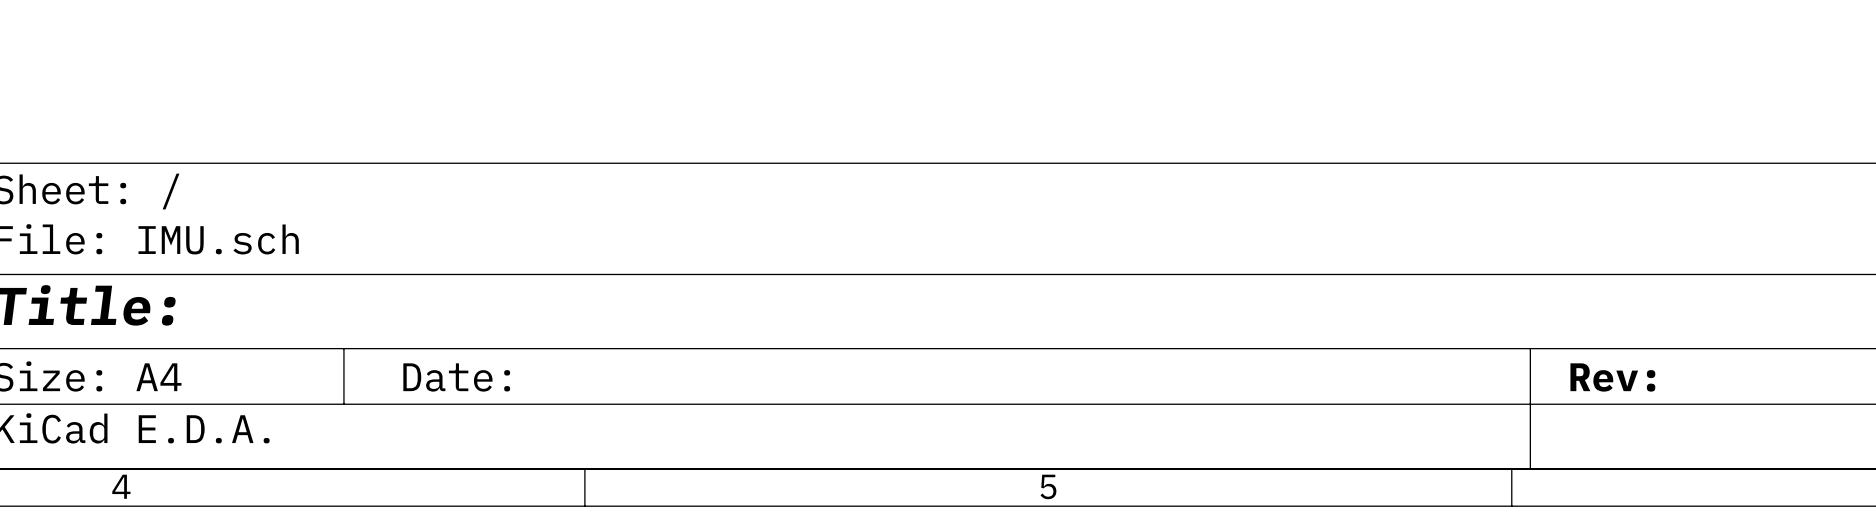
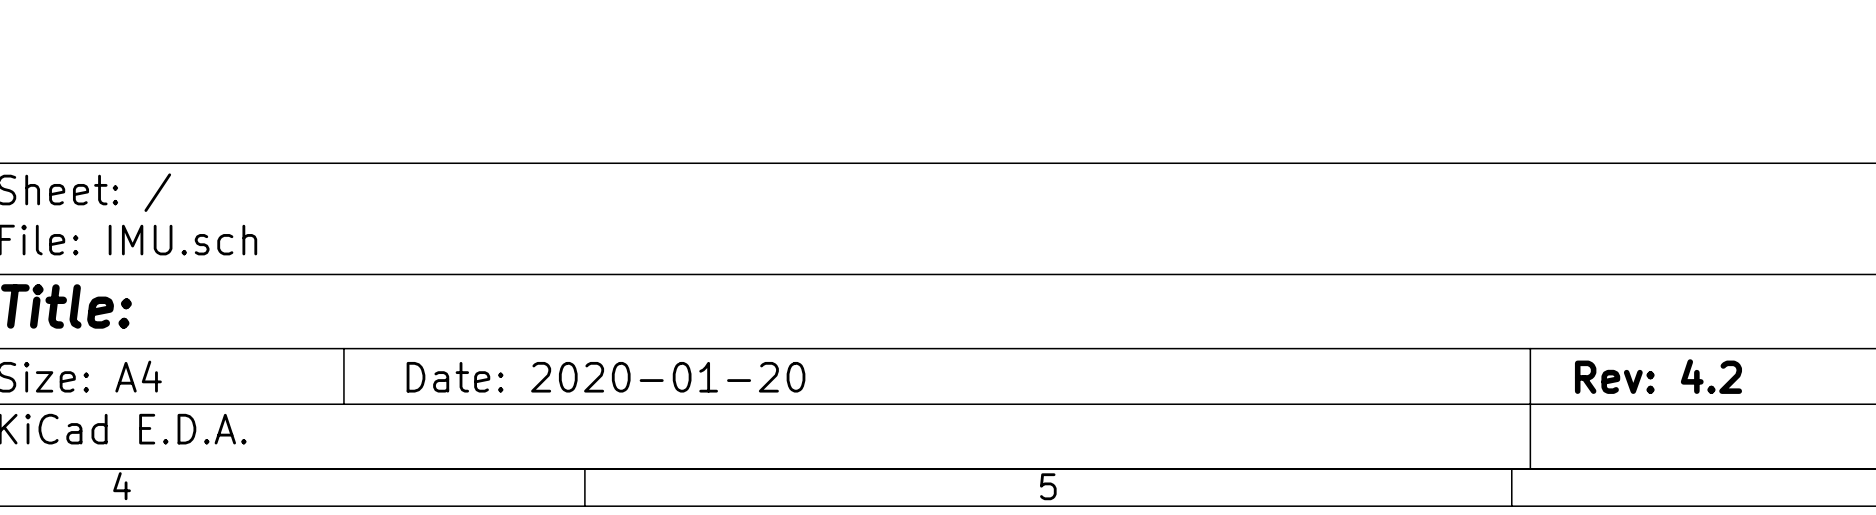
title block: Date: (456, 377) -> Date: 2020-01-20 (606, 377)
title block: Rev: (1612, 377) -> Rev: 4.2 (1658, 376)

